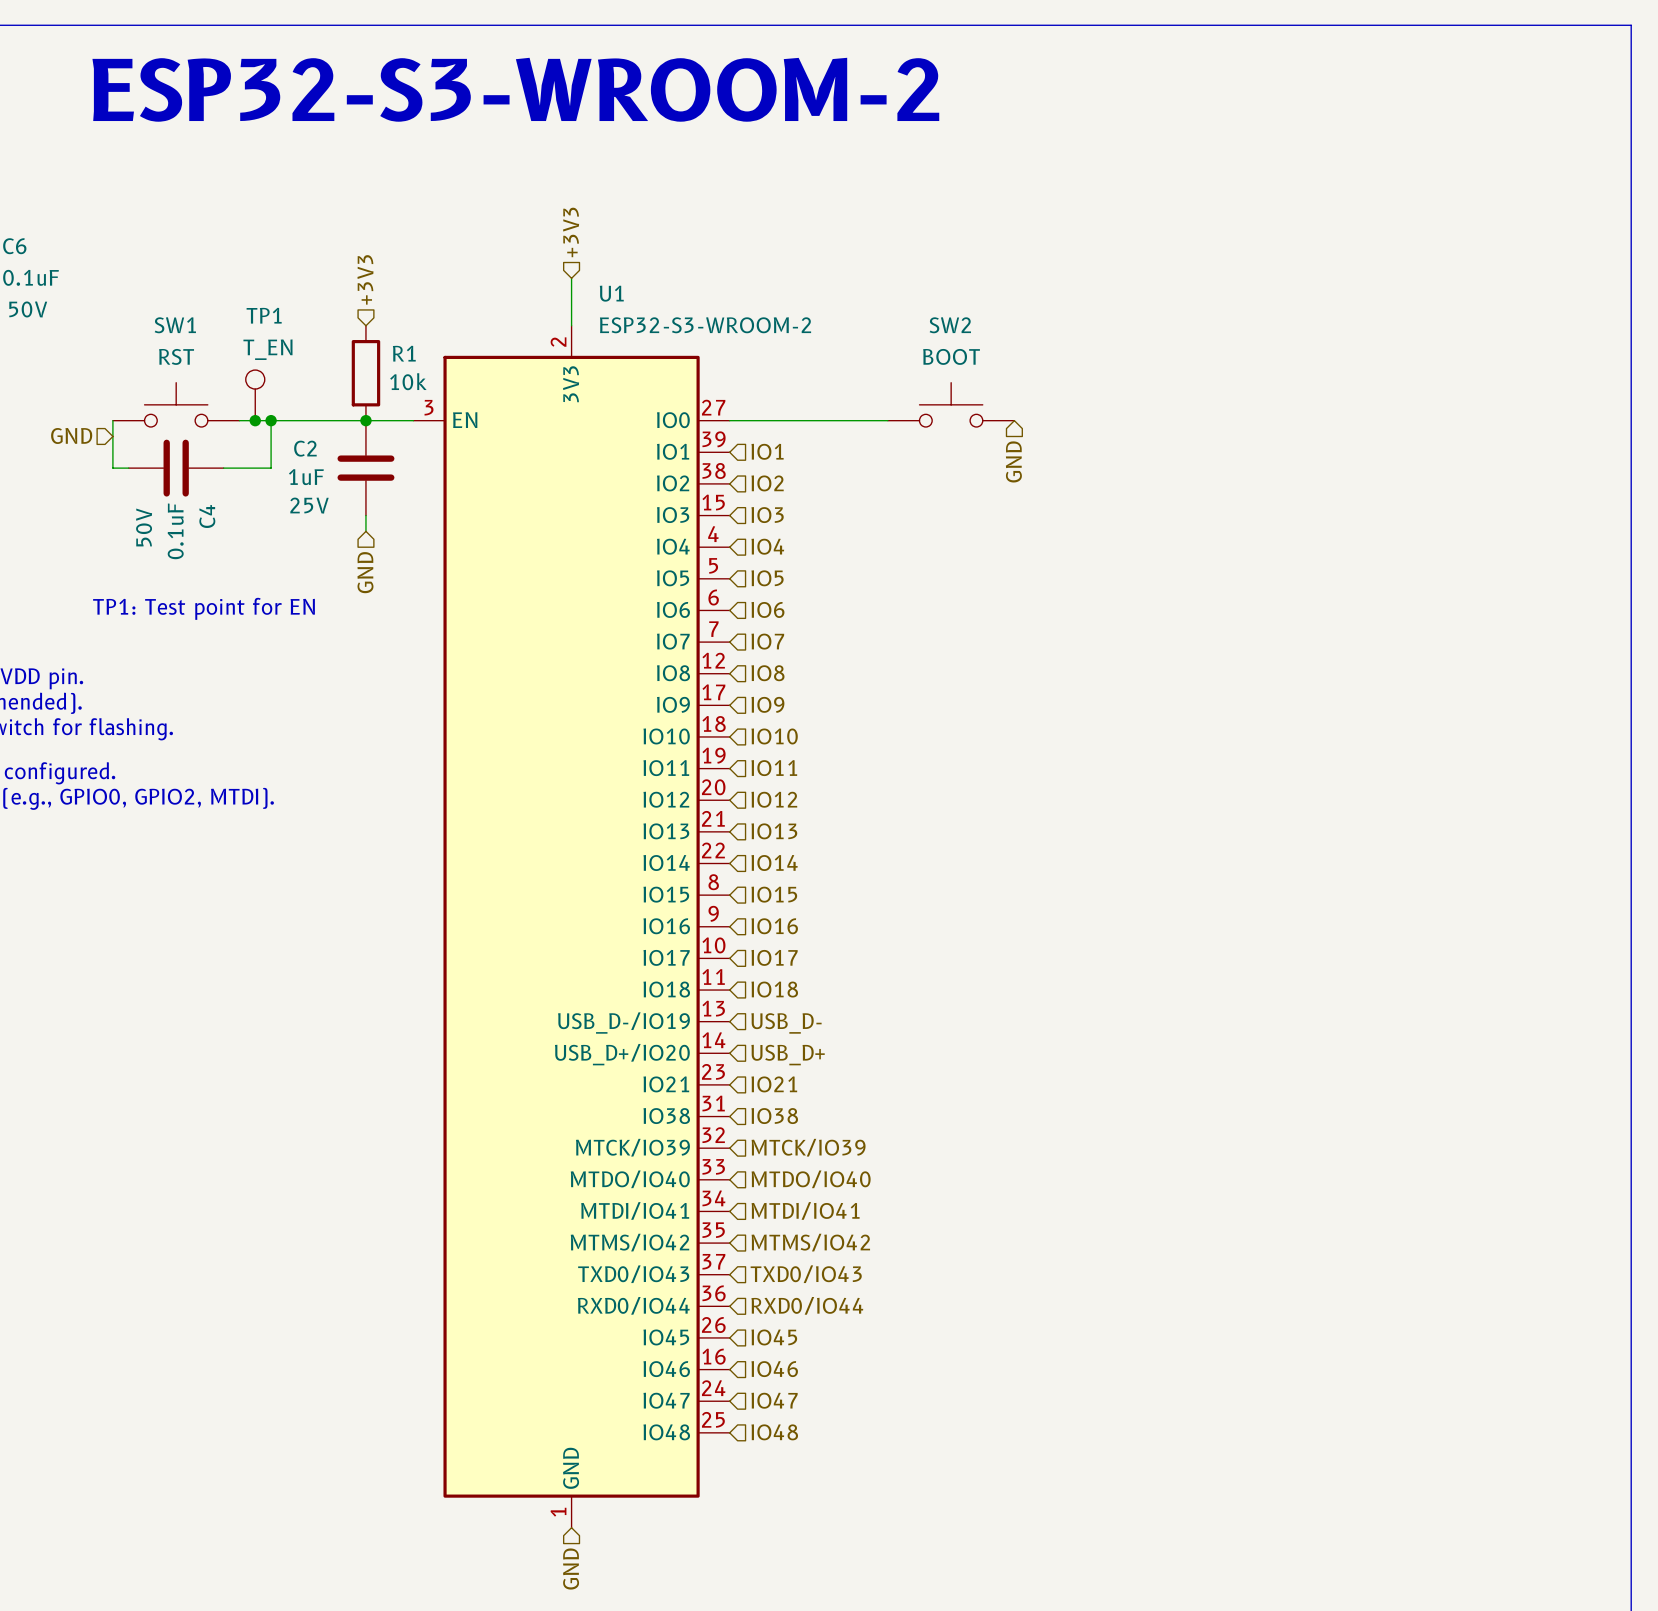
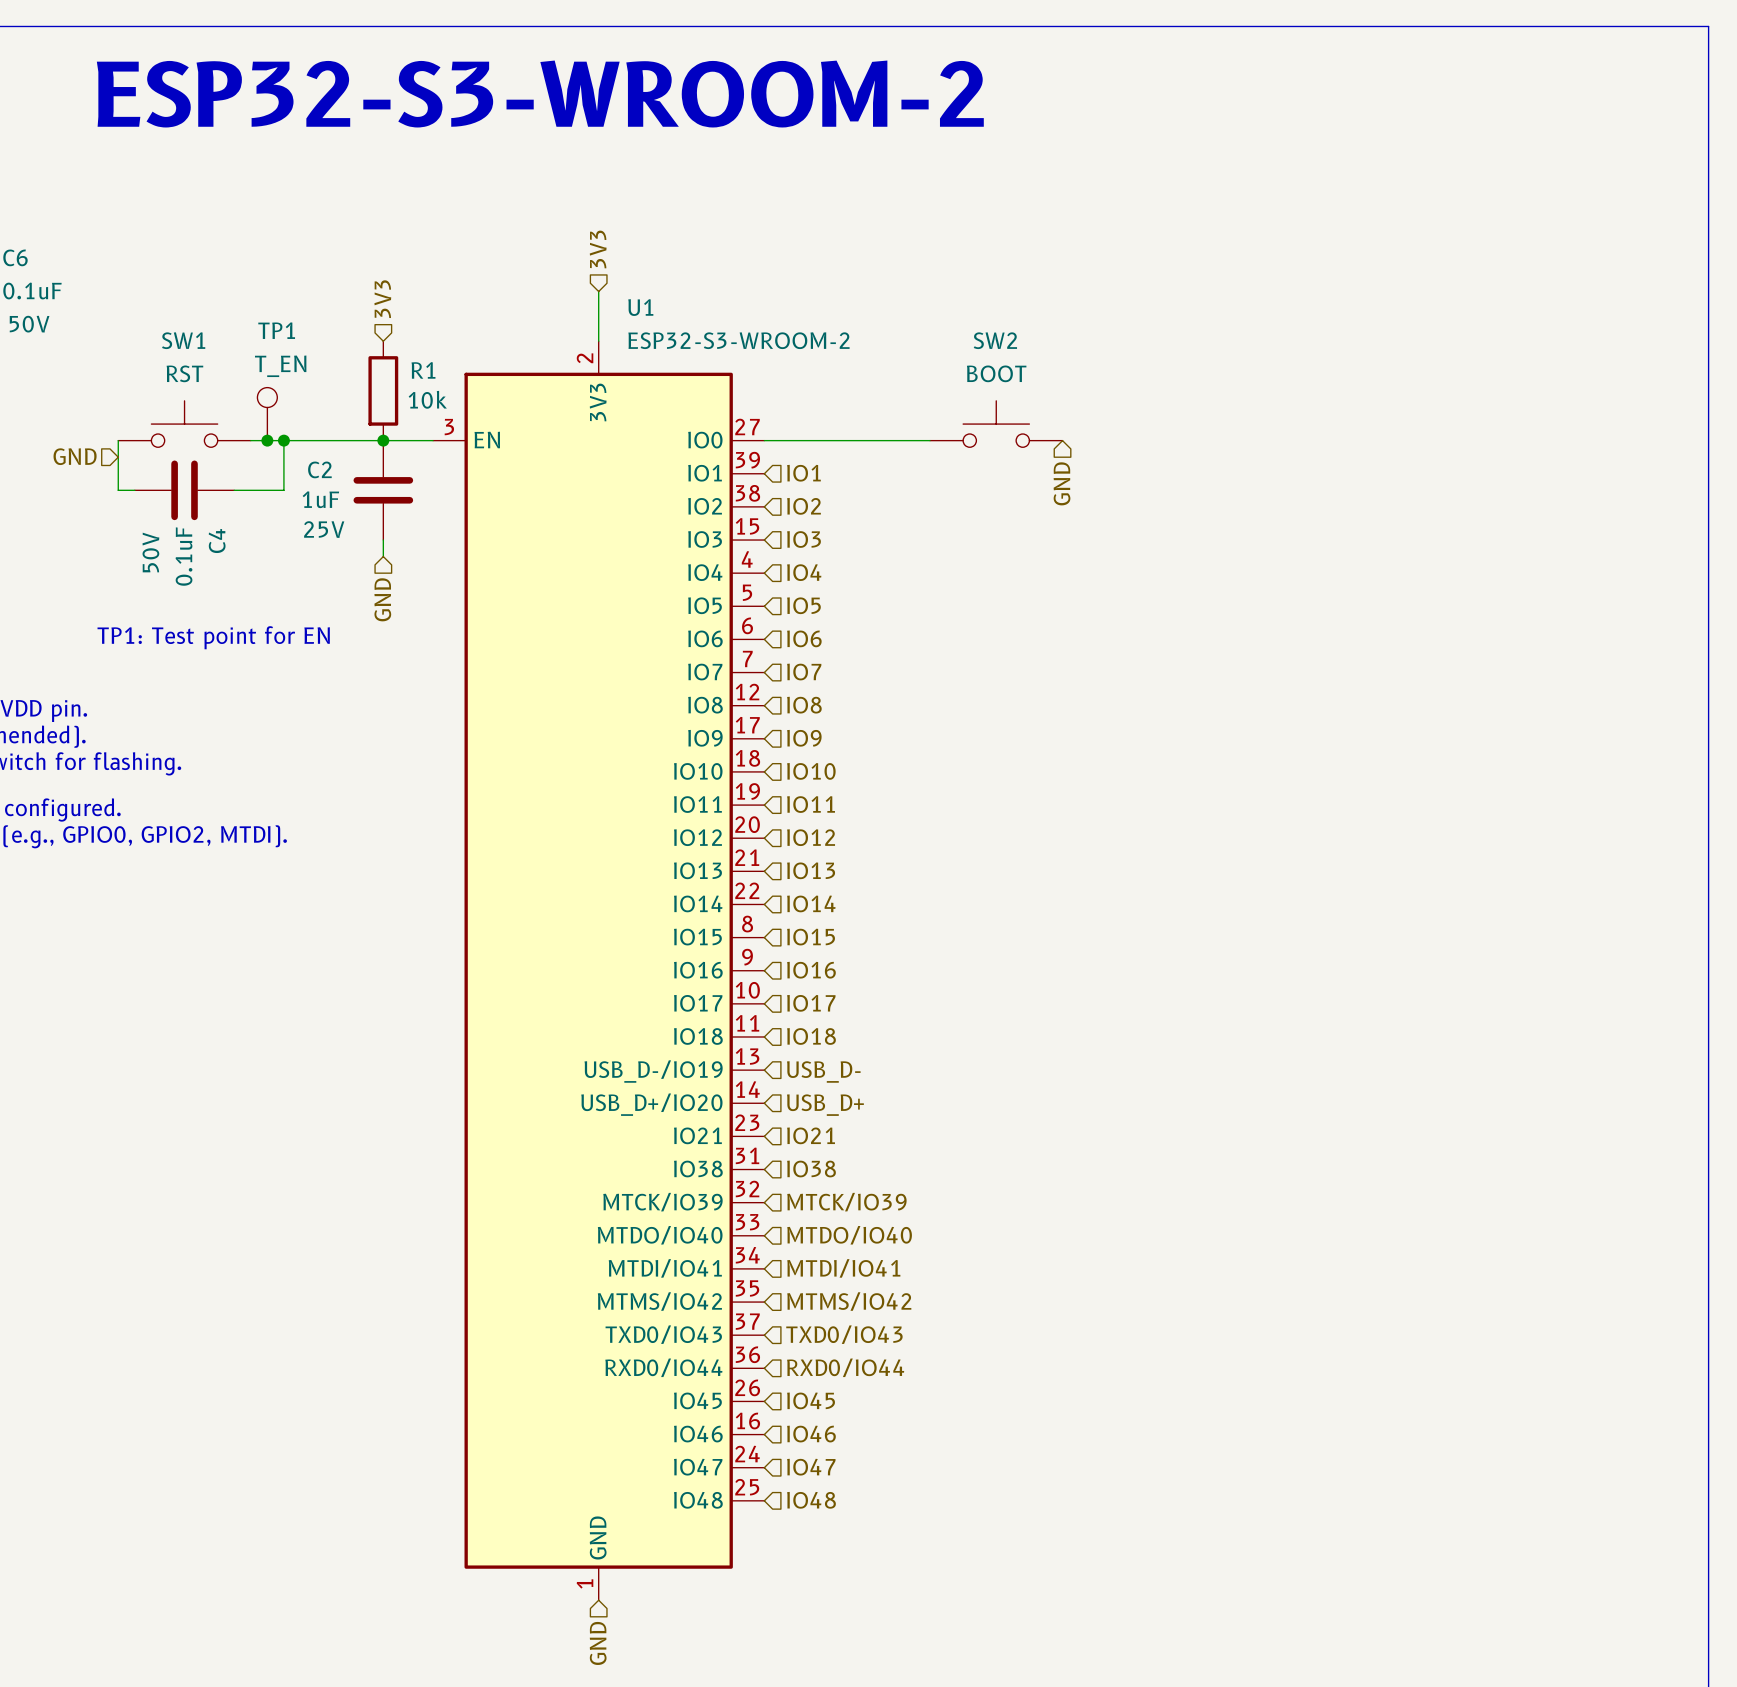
hierarchical label: +3V3 (571, 232) -> 3V3 (598, 249)
hierarchical label: +3V3 (365, 279) -> 3V3 (382, 299)

